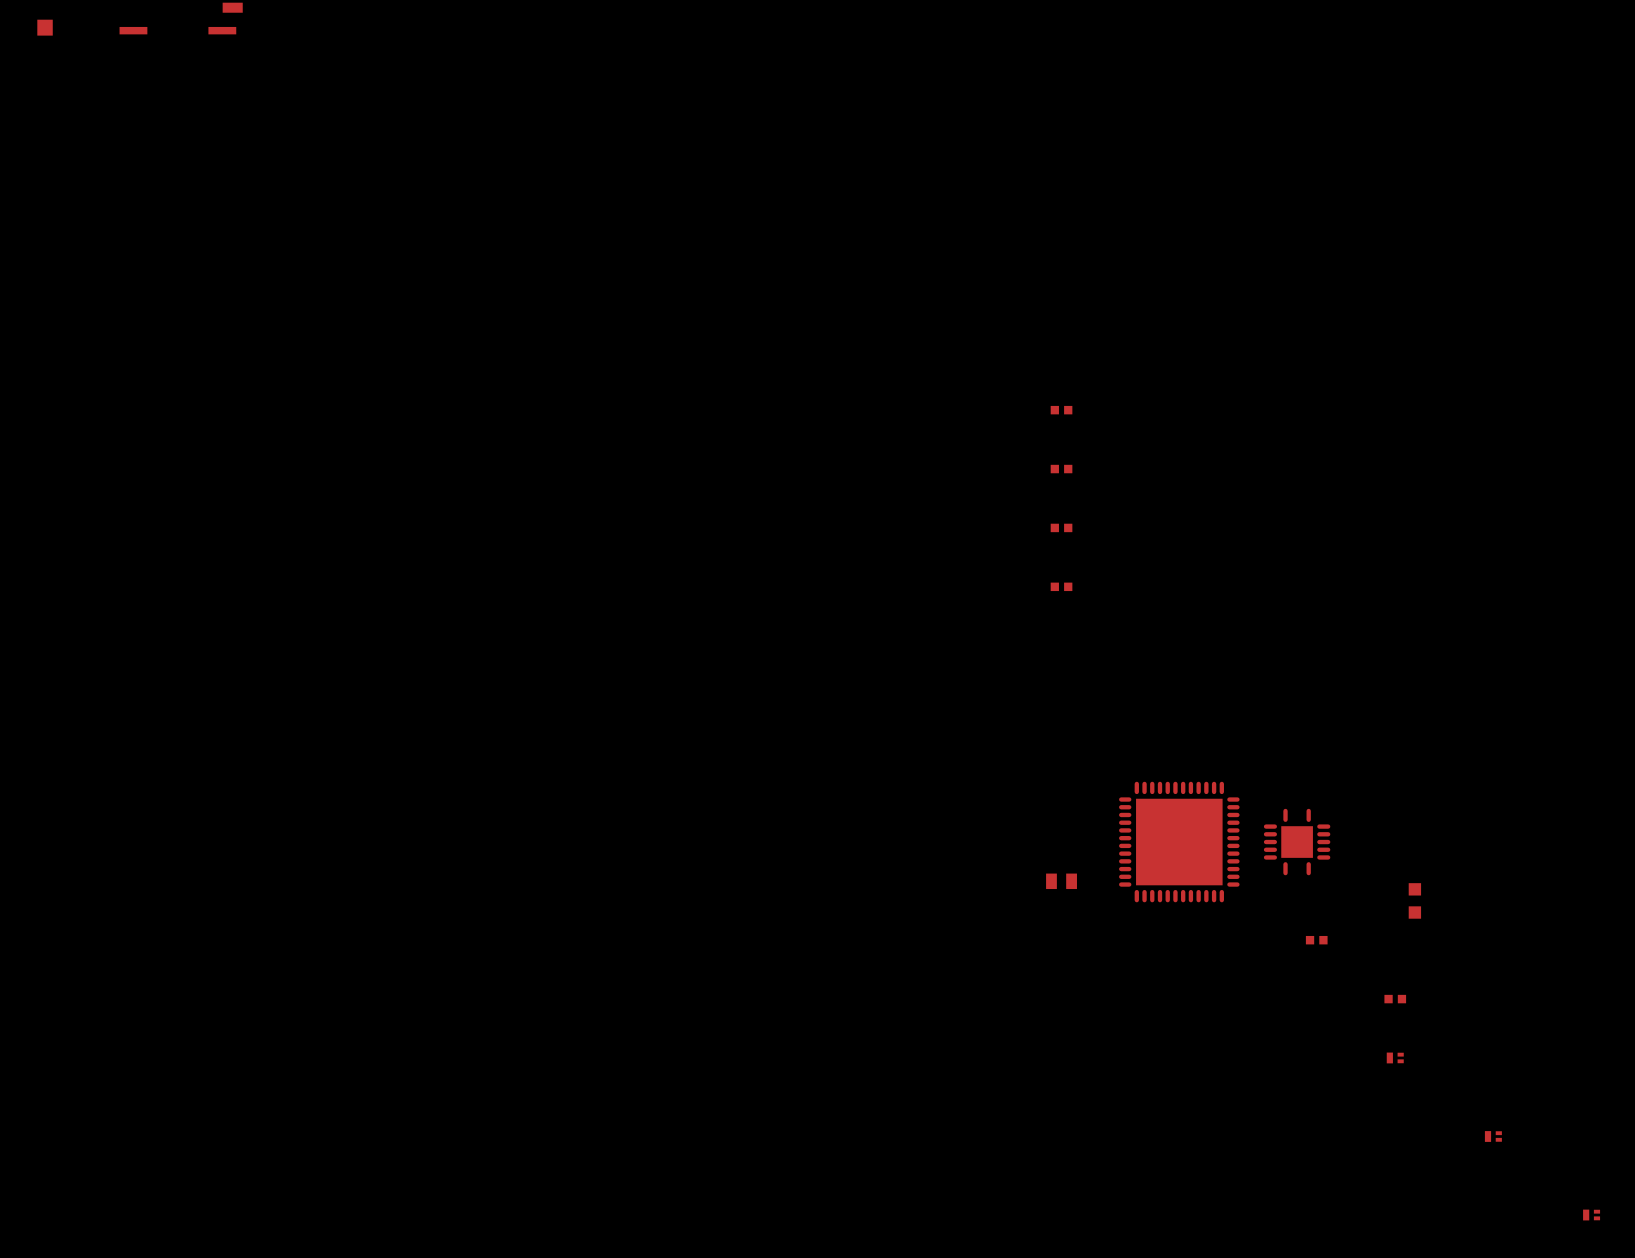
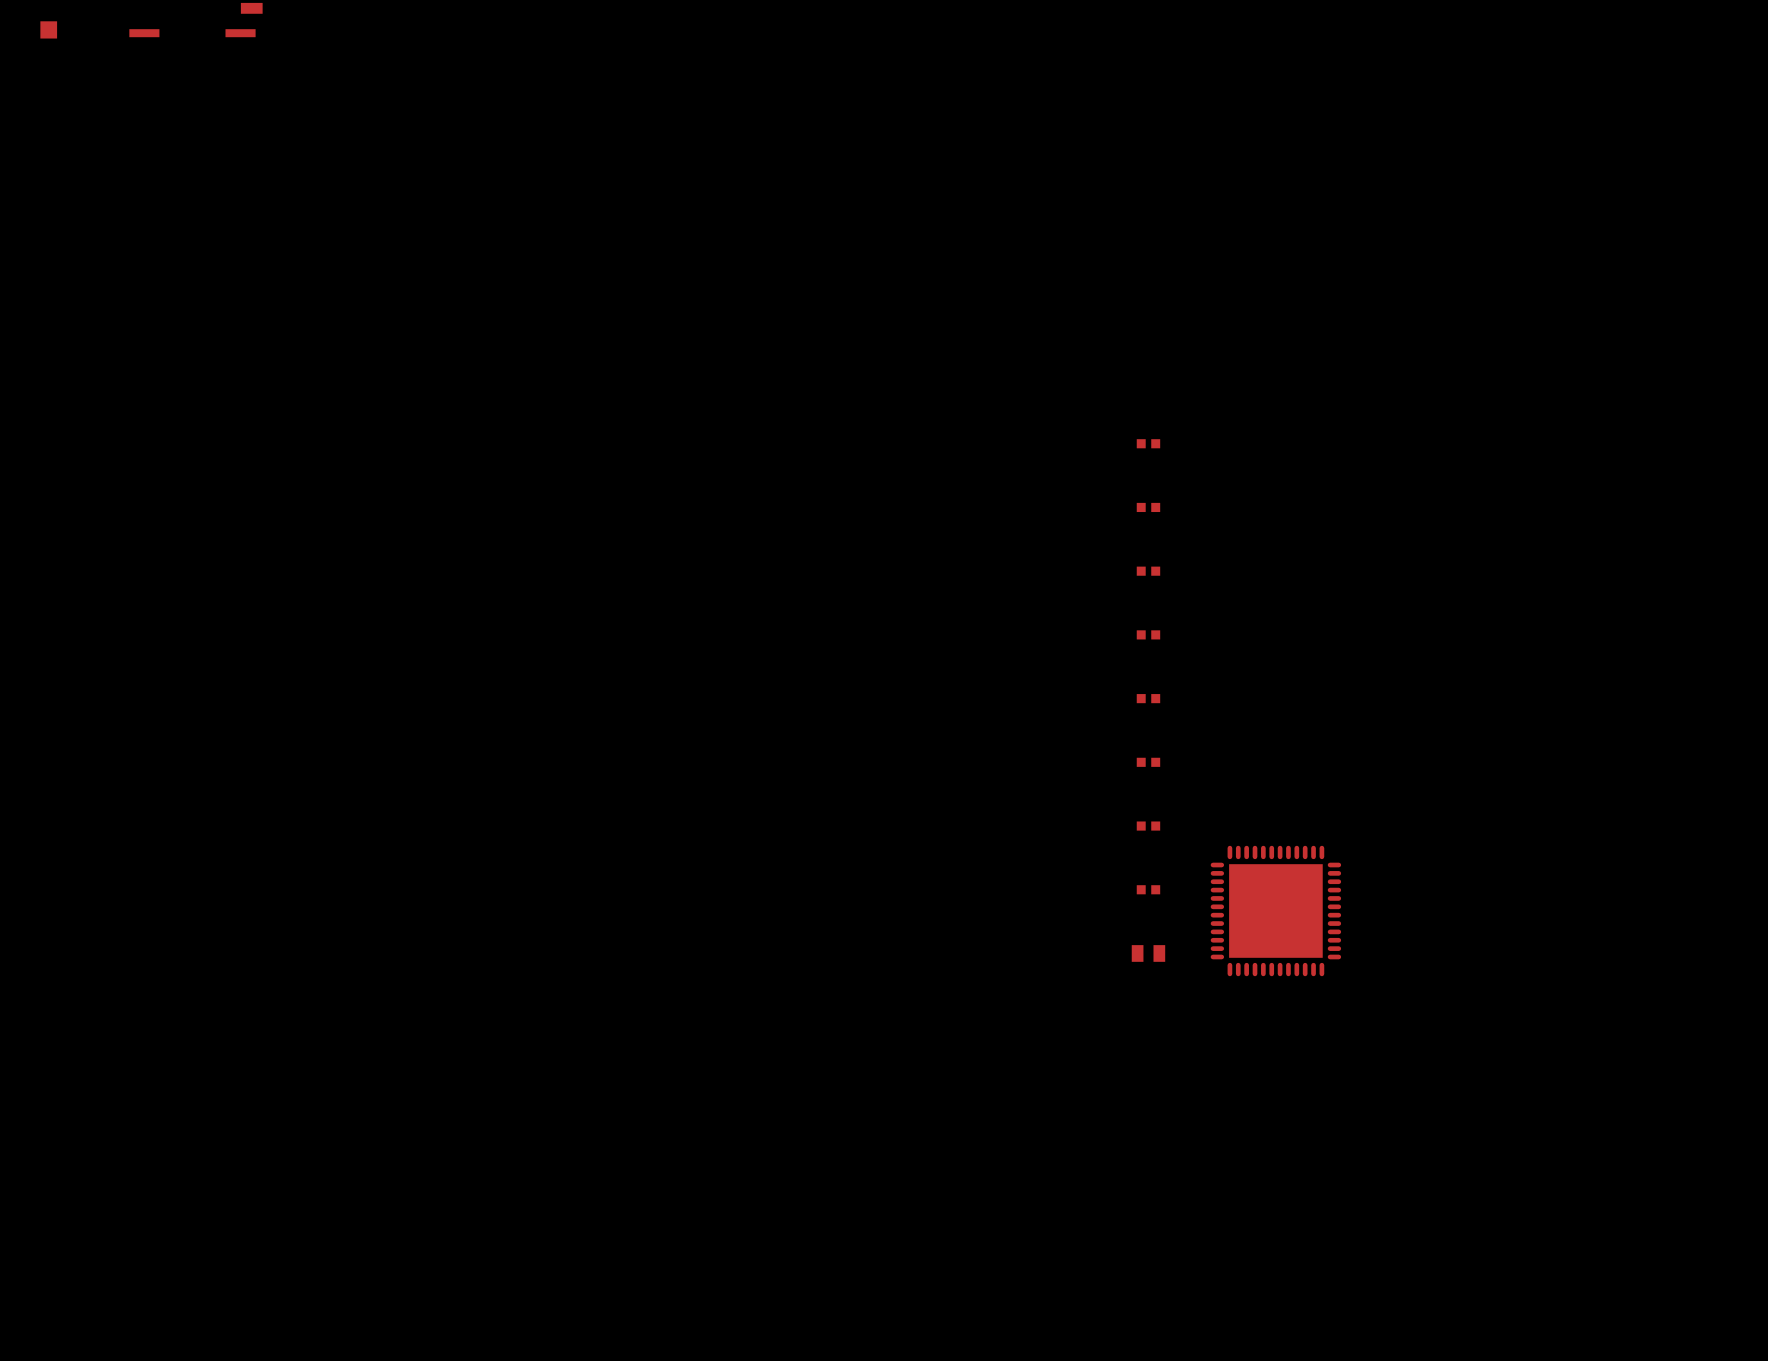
part: none -> (1148, 698)
part: none -> (1148, 762)
part: none -> (1148, 826)
part: none -> (1148, 889)
part: (1297, 842) -> none
part: (1414, 900) -> none
part: (1316, 940) -> none
part: (1395, 999) -> none
part: (1395, 1057) -> none
part: (1493, 1136) -> none
part: (1591, 1215) -> none

